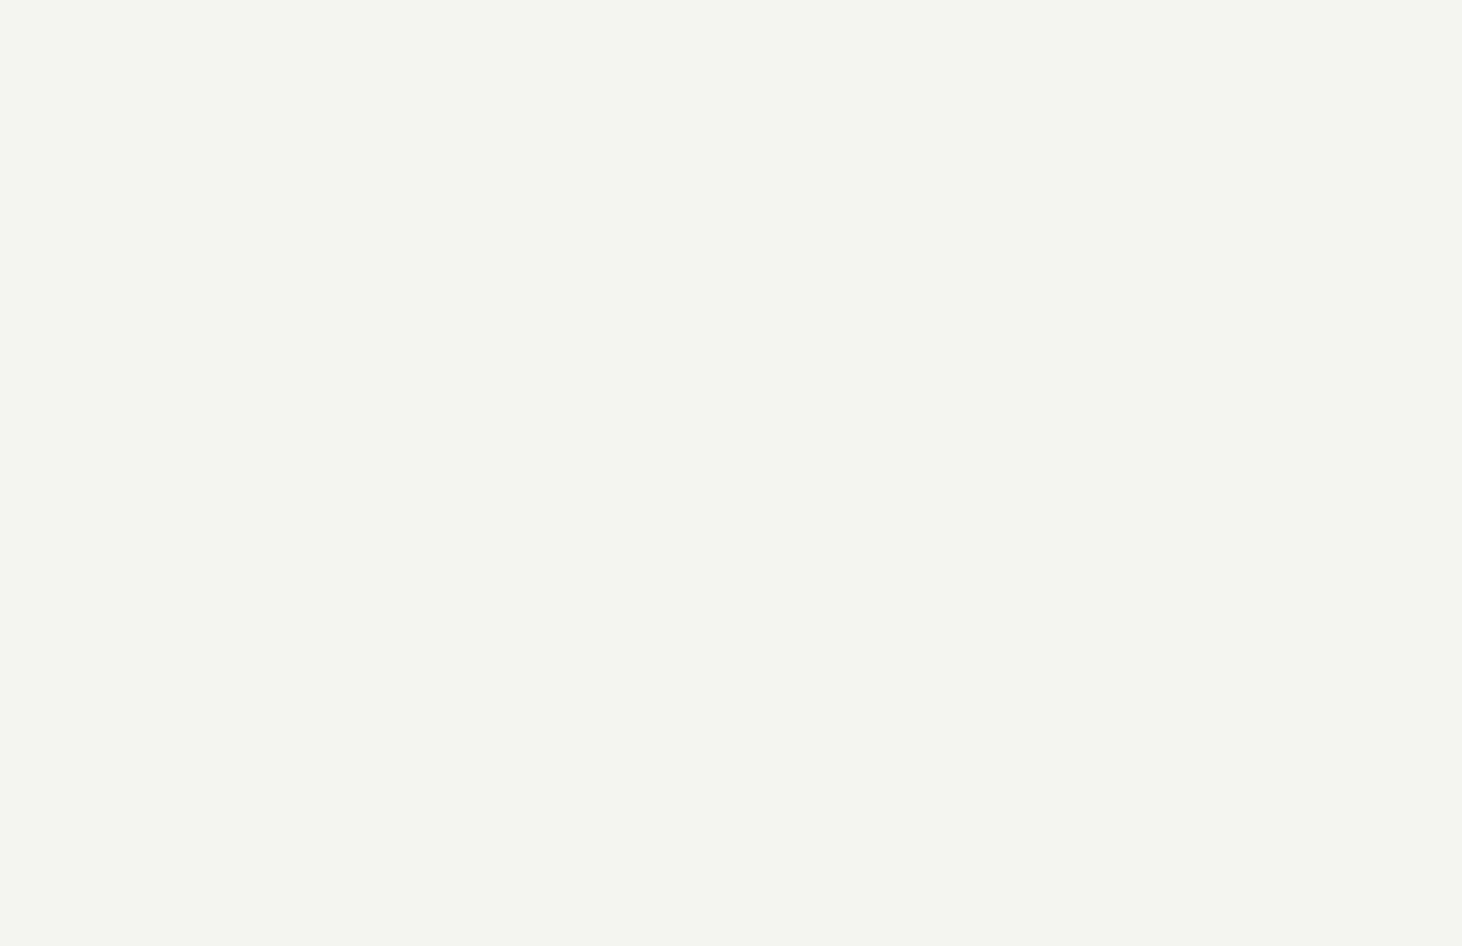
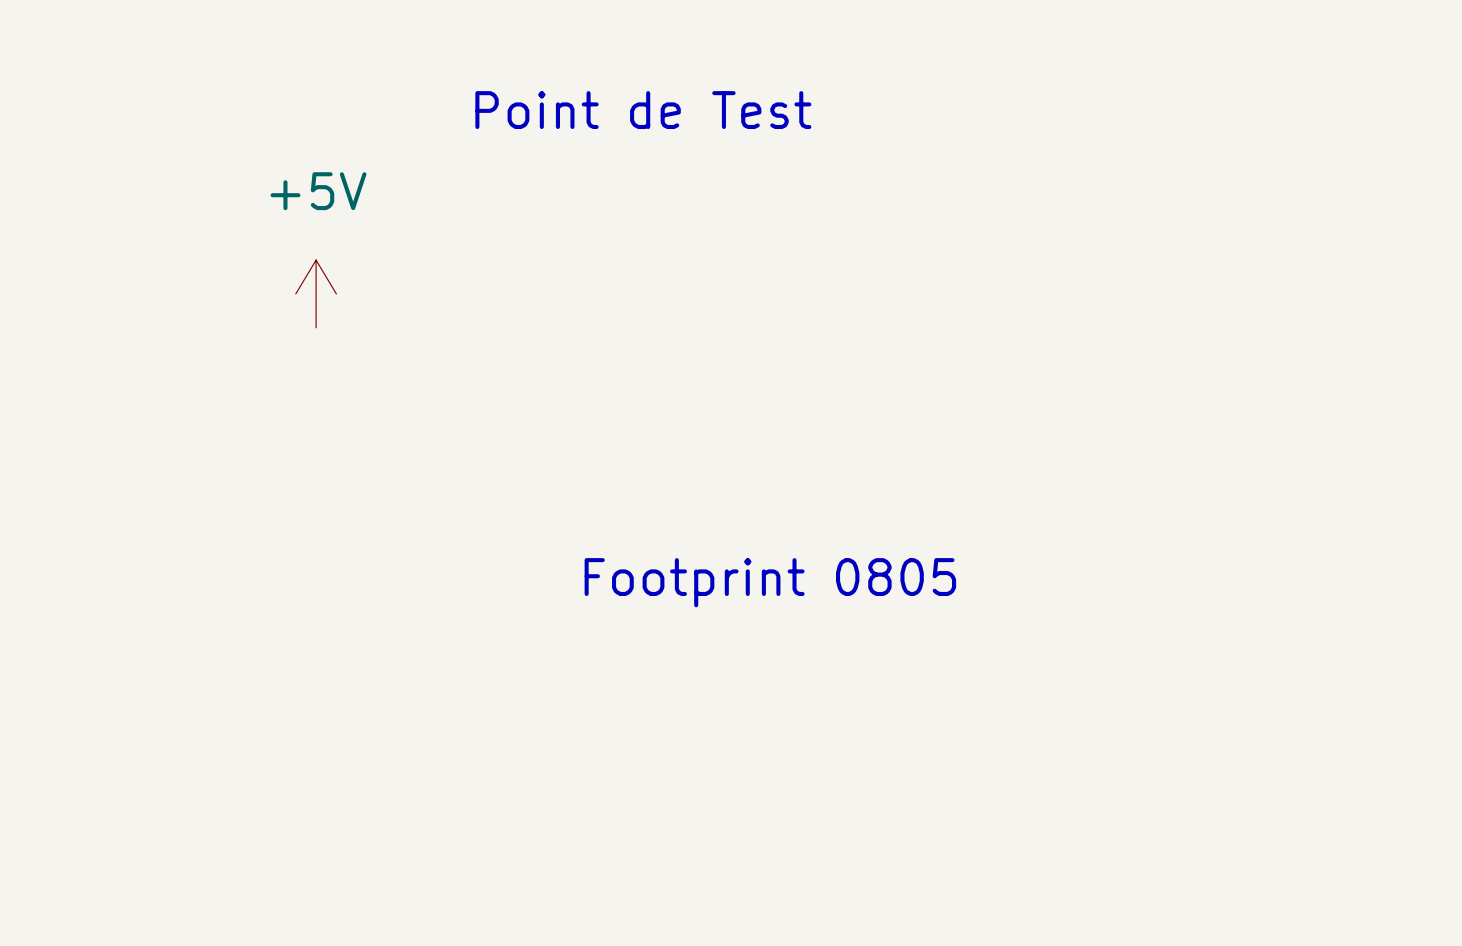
text: none -> Point de Test (643, 110)
power symbol: none -> +5V (316, 293)
text: none -> Footprint 0805 (770, 582)

